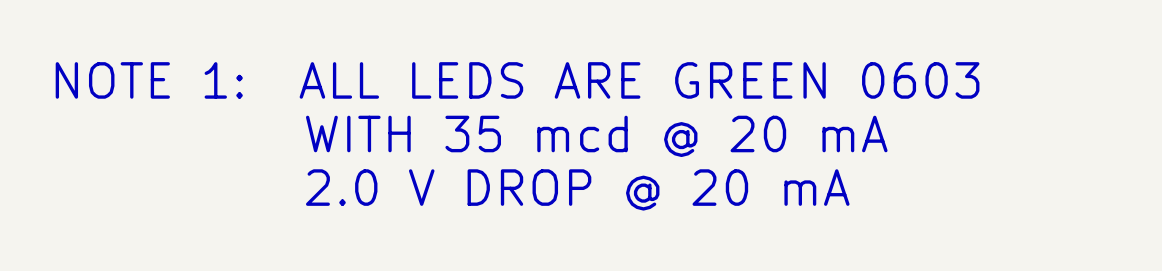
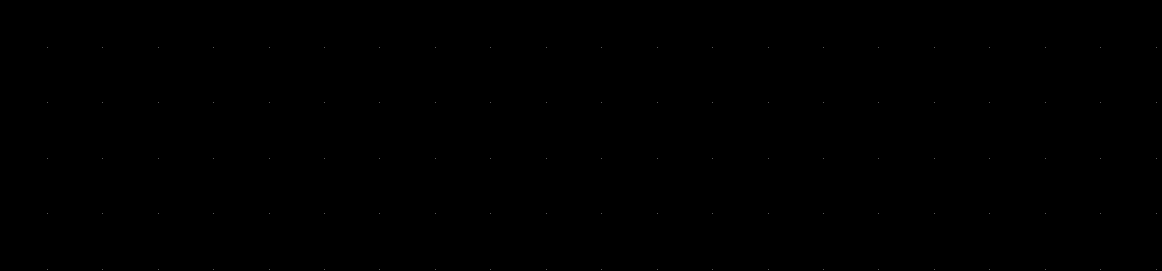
text: NOTE 1: ALL LEDS ARE GREEN 0603 (517, 80) -> none
text: WITH 35 mcd @ 20 mA (596, 136) -> none
text: 2.0 V DROP @ 20 mA (577, 189) -> none

